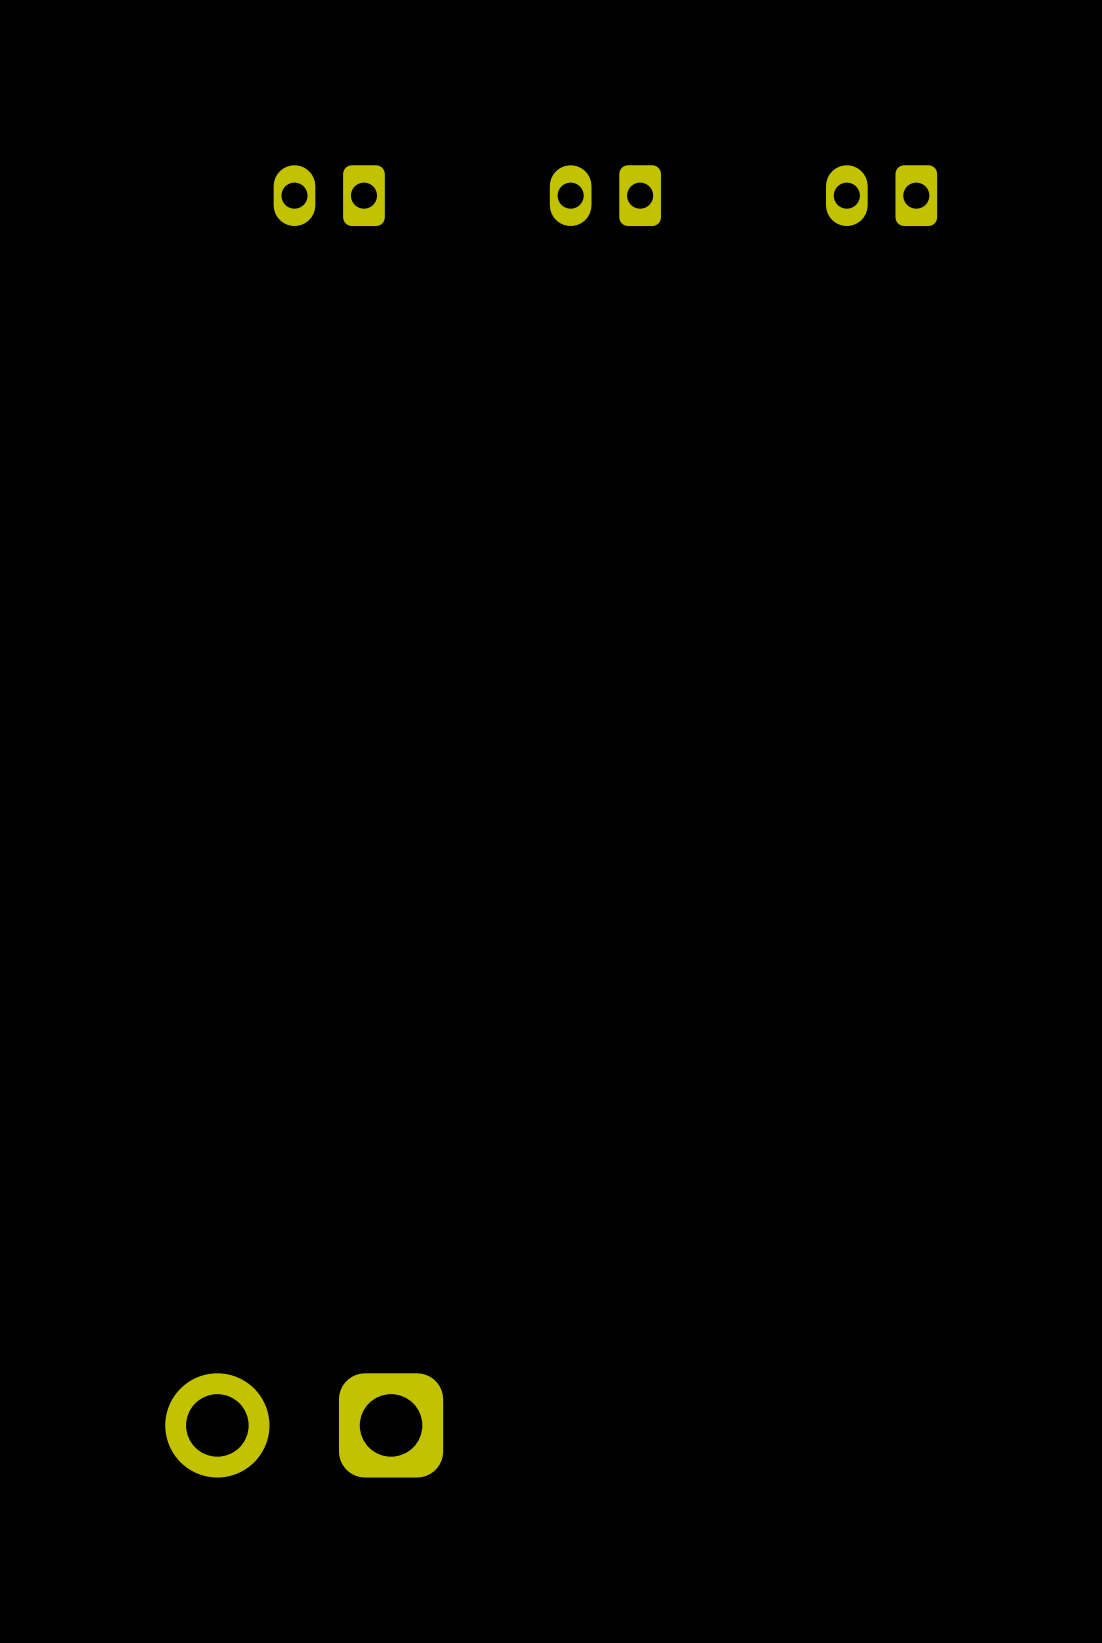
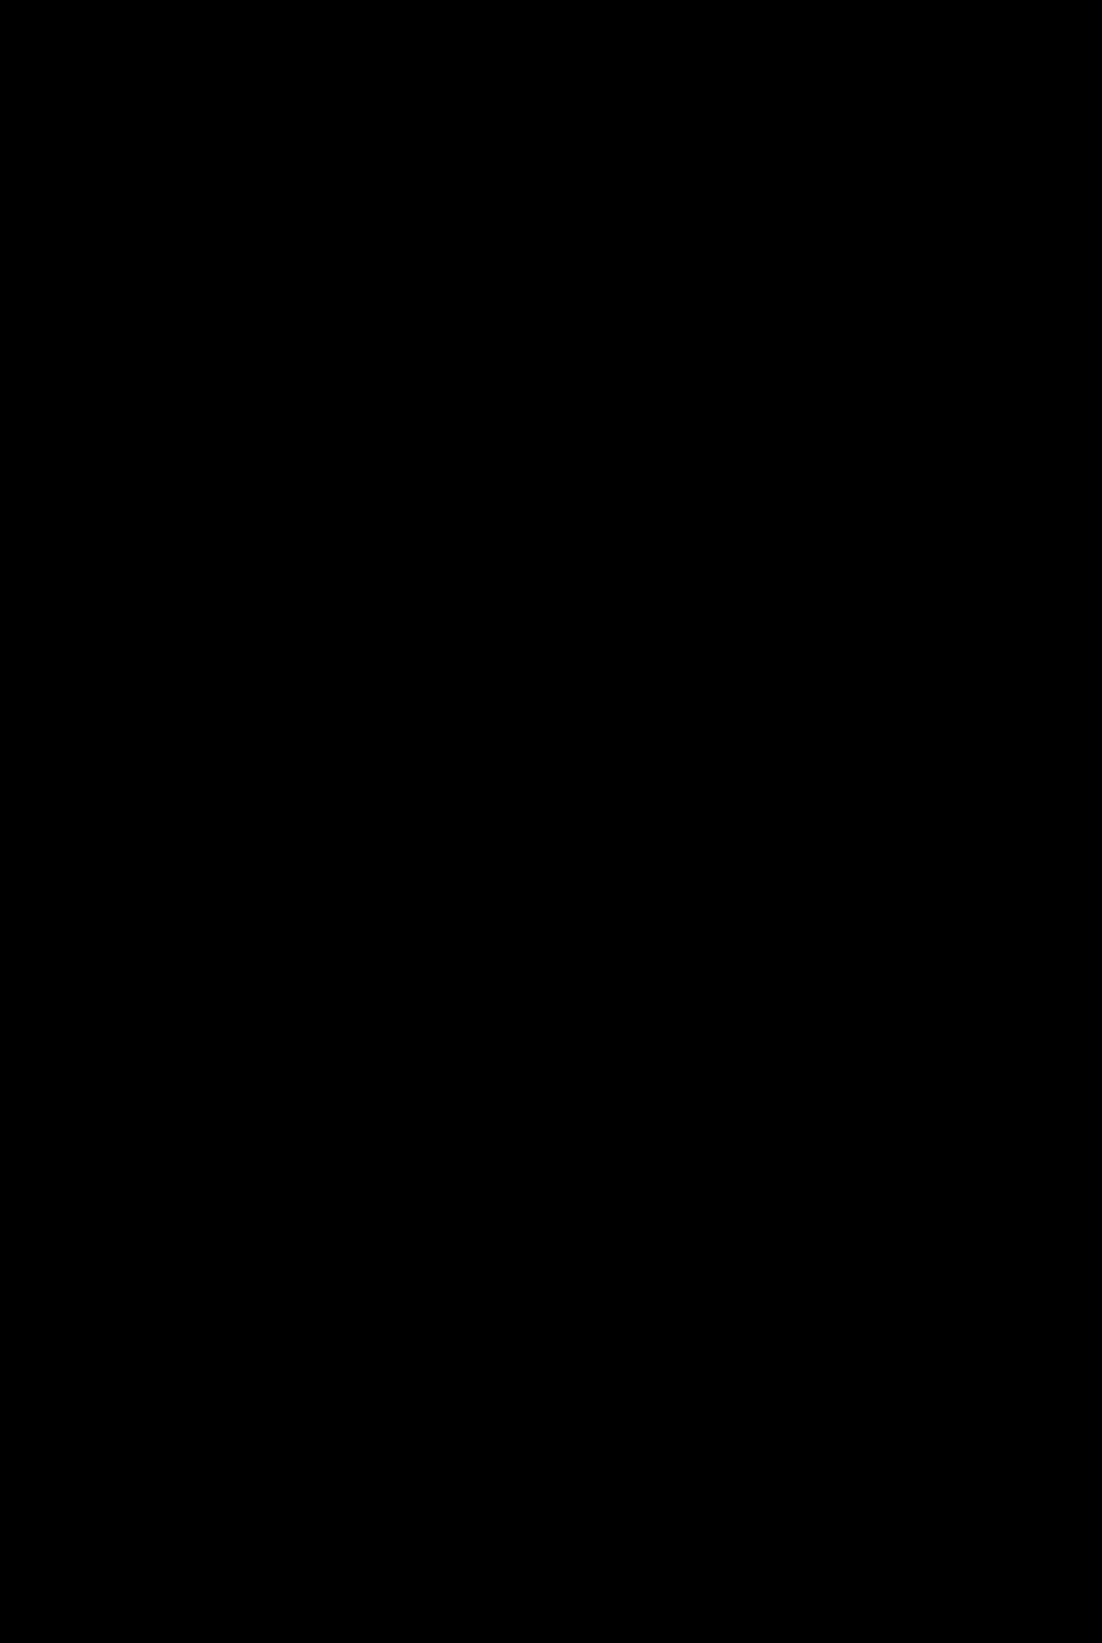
part: (329, 195) -> none
part: (605, 195) -> none
part: (881, 195) -> none
part: (304, 1425) -> none

